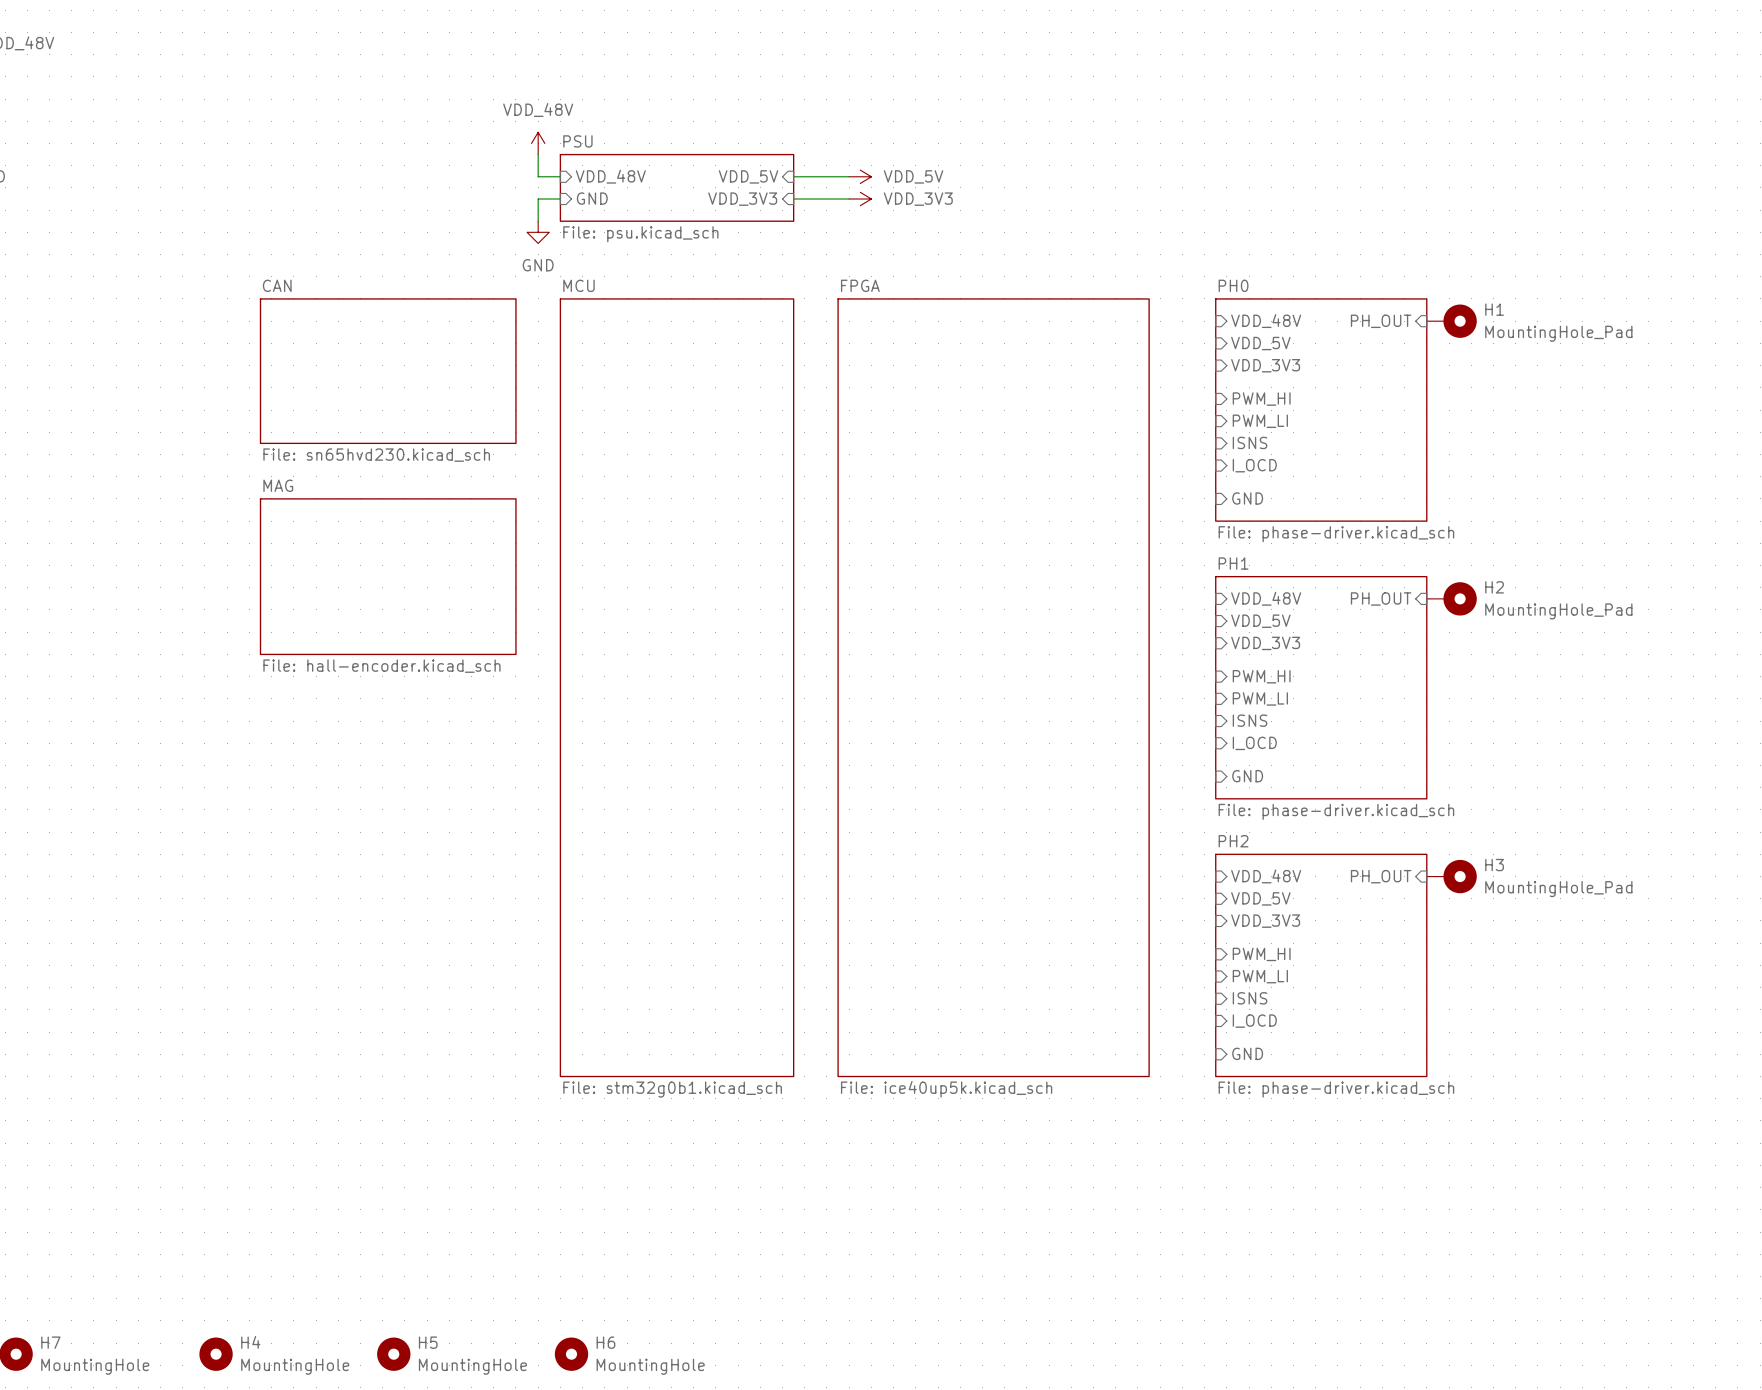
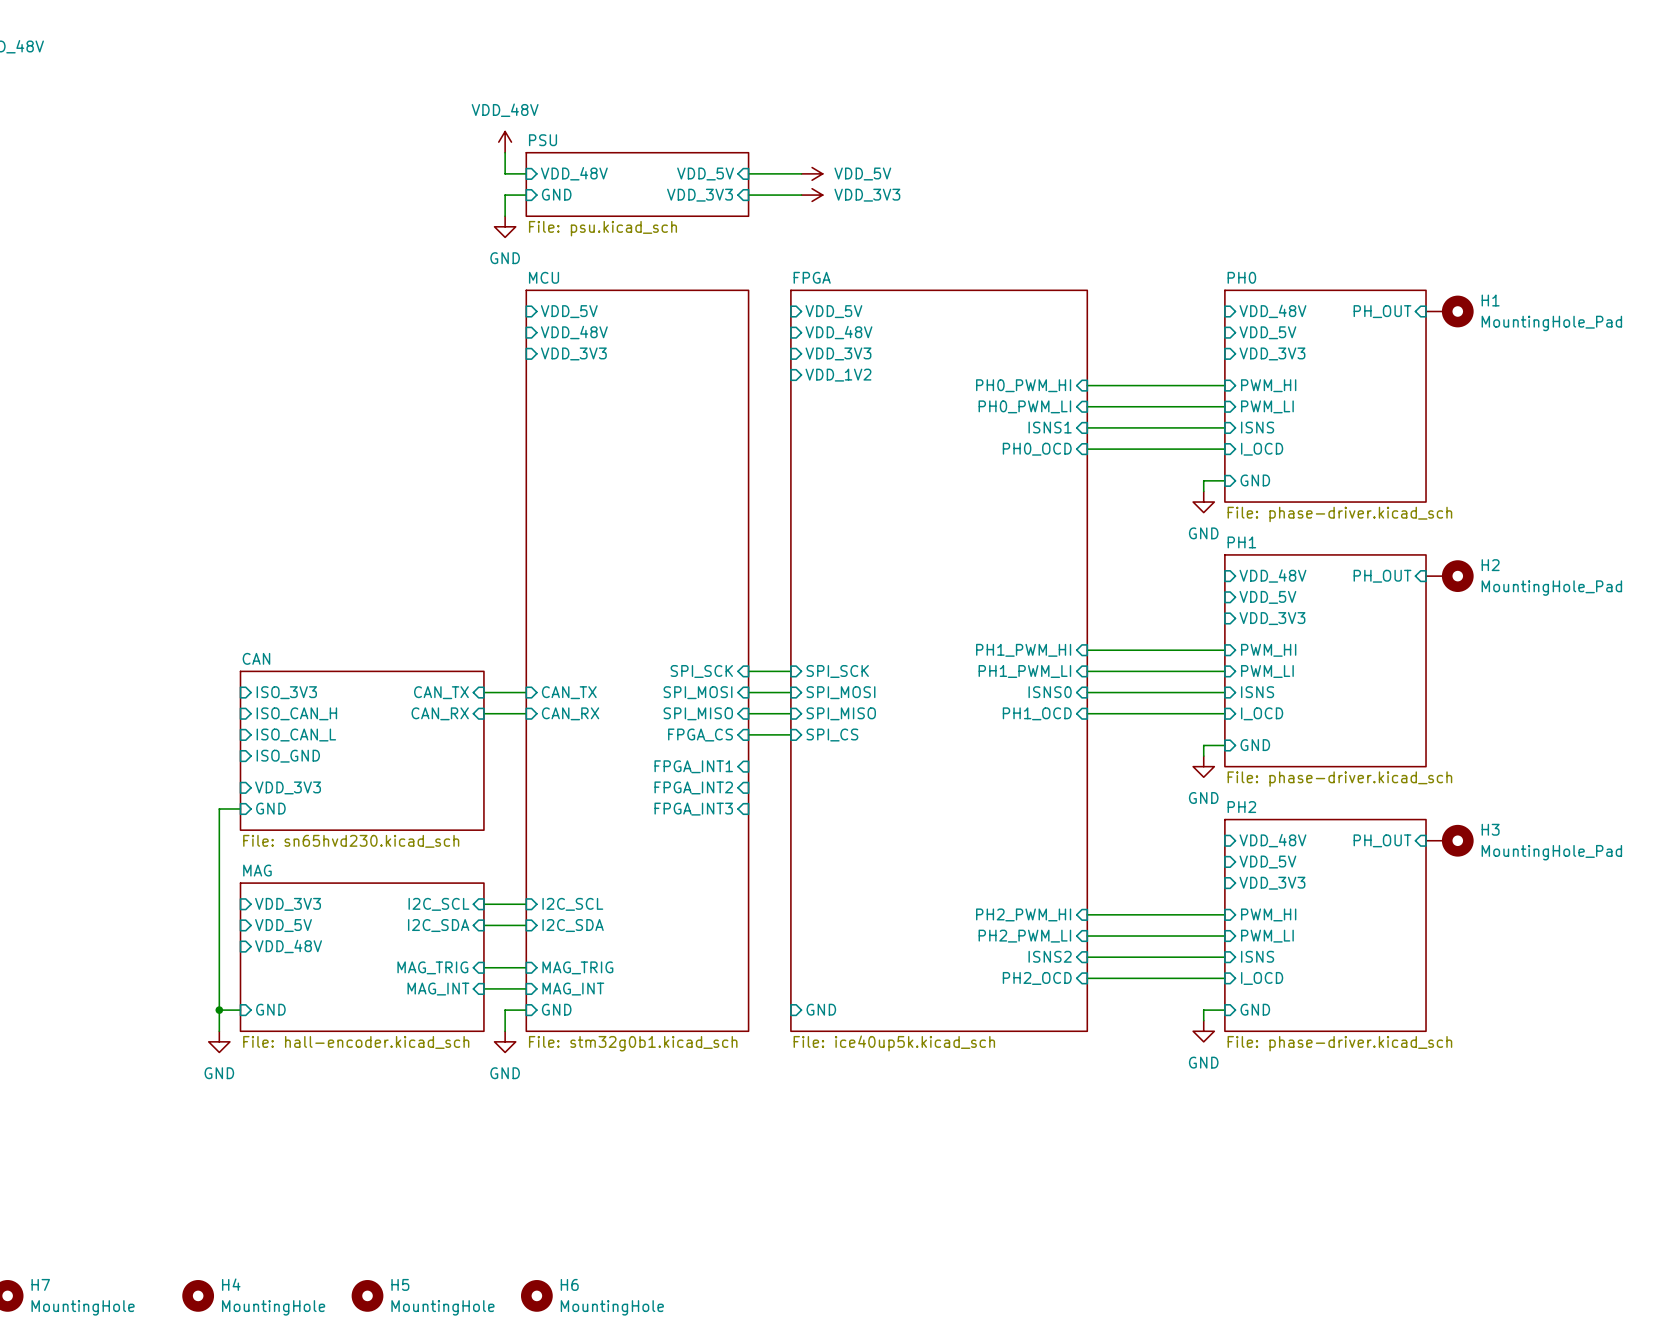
sheet pin: none -> VDD_5V (569, 311)
sheet pin: none -> VDD_5V (833, 311)
sheet pin position: VDD_48V (1266, 321) -> VDD_48V (1272, 311)
sheet pin position: PH_OUT (1381, 321) -> PH_OUT (1382, 311)
H1 position: (1451, 321) -> (1449, 311)
sheet pin: none -> VDD_48V (574, 332)
sheet pin: none -> VDD_48V (838, 332)
sheet pin position: VDD_5V (1260, 343) -> VDD_5V (1267, 332)
sheet pin: none -> VDD_3V3 (573, 353)
sheet pin: none -> VDD_3V3 (838, 353)
sheet pin position: VDD_3V3 (1265, 365) -> VDD_3V3 (1272, 353)
sheet CAN: File: sn65hvd230.kicad_sch (388, 371) -> none
sheet pin: none -> VDD_1V2 (838, 375)
wire: none -> (1087, 385) (1224, 385)
sheet pin: none -> PH0_PWM_HI (1023, 385)
sheet pin position: PWM_HI (1261, 399) -> PWM_HI (1268, 385)
sheet PH0 position: (1321, 410) -> (1325, 396)
sheet pin: none -> PH0_PWM_LI (1024, 406)
wire: none -> (1087, 406) (1224, 406)
sheet pin position: PWM_LI (1260, 421) -> PWM_LI (1267, 406)
sheet pin: none -> ISNS1 (1050, 427)
sheet pin position: ISNS (1250, 442) -> ISNS (1257, 427)
wire: none -> (1087, 427) (1224, 427)
sheet pin: none -> PH0_OCD (1037, 449)
wire: none -> (1087, 449) (1224, 449)
sheet pin position: I_OCD (1254, 465) -> I_OCD (1262, 449)
sheet pin position: GND (1247, 498) -> GND (1255, 480)
wire: none -> (1224, 480) (1203, 480) (1203, 491)
power symbol: none -> GND (1203, 502)
sheet MAG: File: hall-encoder.kicad_sch (388, 576) -> none
sheet pin position: VDD_48V (1266, 598) -> VDD_48V (1272, 575)
sheet pin position: PH_OUT (1381, 598) -> PH_OUT (1382, 576)
H2 position: (1451, 598) -> (1449, 576)
sheet pin position: VDD_5V (1260, 621) -> VDD_5V (1267, 597)
sheet pin position: VDD_3V3 (1265, 643) -> VDD_3V3 (1272, 618)
sheet pin: none -> PH1_PWM_HI (1023, 650)
wire: none -> (1087, 650) (1224, 650)
sheet pin position: PWM_HI (1261, 676) -> PWM_HI (1268, 650)
sheet PH1 position: (1321, 687) -> (1325, 660)
sheet pin: none -> SPI_SCK (701, 671)
wire: none -> (748, 671) (790, 671)
sheet pin: none -> SPI_SCK (837, 671)
sheet pin: none -> PH1_PWM_LI (1024, 671)
wire: none -> (1087, 671) (1224, 671)
sheet pin position: PWM_LI (1260, 698) -> PWM_LI (1267, 671)
sheet pin: none -> ISNS0 (1050, 692)
sheet pin position: ISNS (1250, 720) -> ISNS (1257, 692)
sheet pin: none -> ISO_3V3 (286, 692)
sheet pin: none -> CAN_TX (441, 692)
wire: none -> (483, 692) (526, 692)
sheet pin: none -> CAN_TX (569, 692)
sheet pin: none -> SPI_MOSI (698, 692)
wire: none -> (748, 692) (790, 692)
sheet pin: none -> SPI_MOSI (840, 692)
wire: none -> (1087, 692) (1224, 692)
sheet pin: none -> ISO_CAN_H (296, 713)
sheet pin: none -> CAN_RX (440, 713)
wire: none -> (483, 713) (526, 713)
sheet pin: none -> CAN_RX (570, 713)
sheet pin: none -> SPI_MISO (698, 713)
wire: none -> (748, 713) (790, 713)
sheet pin: none -> SPI_MISO (841, 713)
sheet pin: none -> PH1_OCD (1037, 713)
wire: none -> (1087, 713) (1224, 713)
sheet pin position: I_OCD (1254, 743) -> I_OCD (1262, 713)
sheet pin: none -> ISO_CAN_L (296, 735)
sheet pin: none -> FPGA_CS (700, 735)
wire: none -> (748, 734) (790, 734)
sheet pin: none -> SPI_CS (832, 735)
sheet pin position: GND (1247, 776) -> GND (1255, 745)
wire: none -> (1224, 745) (1203, 745) (1203, 756)
sheet CAN: none -> File: sn65hvd230.kicad_sch (362, 750)
sheet pin: none -> ISO_GND (288, 756)
sheet pin: none -> FPGA_INT1 (693, 766)
power symbol: none -> GND (1203, 766)
sheet pin: none -> VDD_3V3 (288, 787)
sheet pin: none -> FPGA_INT2 (693, 787)
sheet pin: none -> GND (270, 808)
wire: none -> (240, 808) (219, 808) (219, 1031)
sheet pin: none -> FPGA_INT3 (693, 809)
sheet pin position: VDD_48V (1266, 876) -> VDD_48V (1272, 840)
sheet pin position: PH_OUT (1381, 876) -> PH_OUT (1382, 840)
H3 position: (1451, 876) -> (1449, 840)
sheet pin position: VDD_5V (1260, 898) -> VDD_5V (1267, 862)
sheet pin position: VDD_3V3 (1265, 921) -> VDD_3V3 (1272, 883)
sheet pin: none -> VDD_3V3 (288, 904)
sheet pin: none -> I2C_SCL (438, 904)
wire: none -> (483, 904) (526, 904)
sheet pin: none -> I2C_SCL (572, 904)
sheet pin: none -> PH2_PWM_HI (1023, 914)
wire: none -> (1087, 914) (1224, 914)
sheet pin position: PWM_HI (1261, 954) -> PWM_HI (1268, 914)
sheet pin: none -> VDD_5V (283, 925)
sheet pin: none -> I2C_SDA (438, 925)
wire: none -> (483, 925) (526, 925)
sheet pin: none -> I2C_SDA (573, 925)
sheet PH2 position: (1321, 965) -> (1325, 925)
sheet pin: none -> PH2_PWM_LI (1024, 936)
wire: none -> (1087, 936) (1224, 936)
sheet pin position: PWM_LI (1260, 976) -> PWM_LI (1267, 936)
sheet pin: none -> VDD_48V (288, 946)
sheet MAG: none -> File: hall-encoder.kicad_sch (362, 957)
sheet pin: none -> ISNS2 (1050, 956)
wire: none -> (1087, 957) (1224, 957)
sheet pin position: ISNS (1250, 998) -> ISNS (1257, 956)
sheet pin: none -> MAG_TRIG (432, 967)
wire: none -> (483, 967) (526, 967)
sheet pin: none -> MAG_TRIG (577, 967)
wire: none -> (1087, 978) (1224, 978)
sheet pin: none -> PH2_OCD (1037, 978)
sheet pin position: I_OCD (1254, 1021) -> I_OCD (1262, 978)
sheet pin: none -> MAG_INT (438, 989)
wire: none -> (483, 988) (526, 988)
sheet pin: none -> MAG_INT (573, 989)
sheet pin: none -> GND (270, 1009)
sheet pin: none -> GND (556, 1009)
sheet pin: none -> GND (821, 1009)
sheet pin position: GND (1247, 1053) -> GND (1255, 1009)
wire: none -> (219, 1010) (240, 1010)
junction: none -> (219, 1010)
wire: none -> (526, 1010) (505, 1010) (505, 1031)
wire: none -> (1224, 1010) (1203, 1010) (1203, 1020)
power symbol: none -> GND (1203, 1031)
power symbol: none -> GND (219, 1041)
power symbol: none -> GND (505, 1041)

